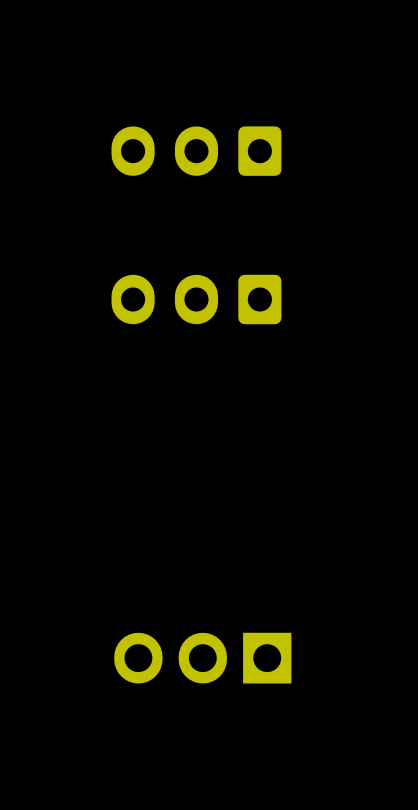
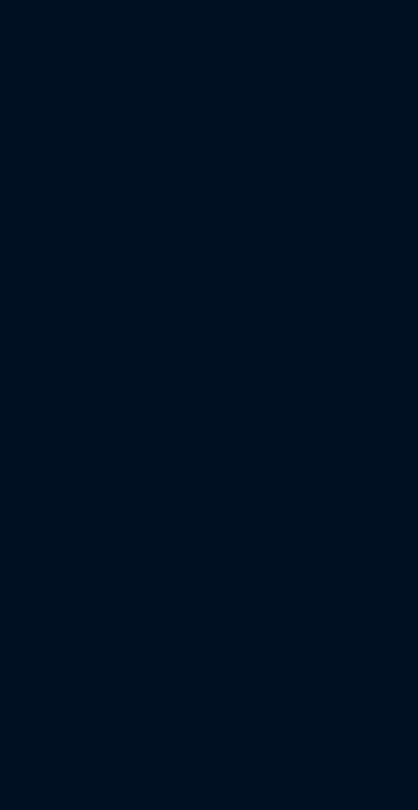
part: (196, 151) -> none
part: (196, 299) -> none
part: (202, 658) -> none

